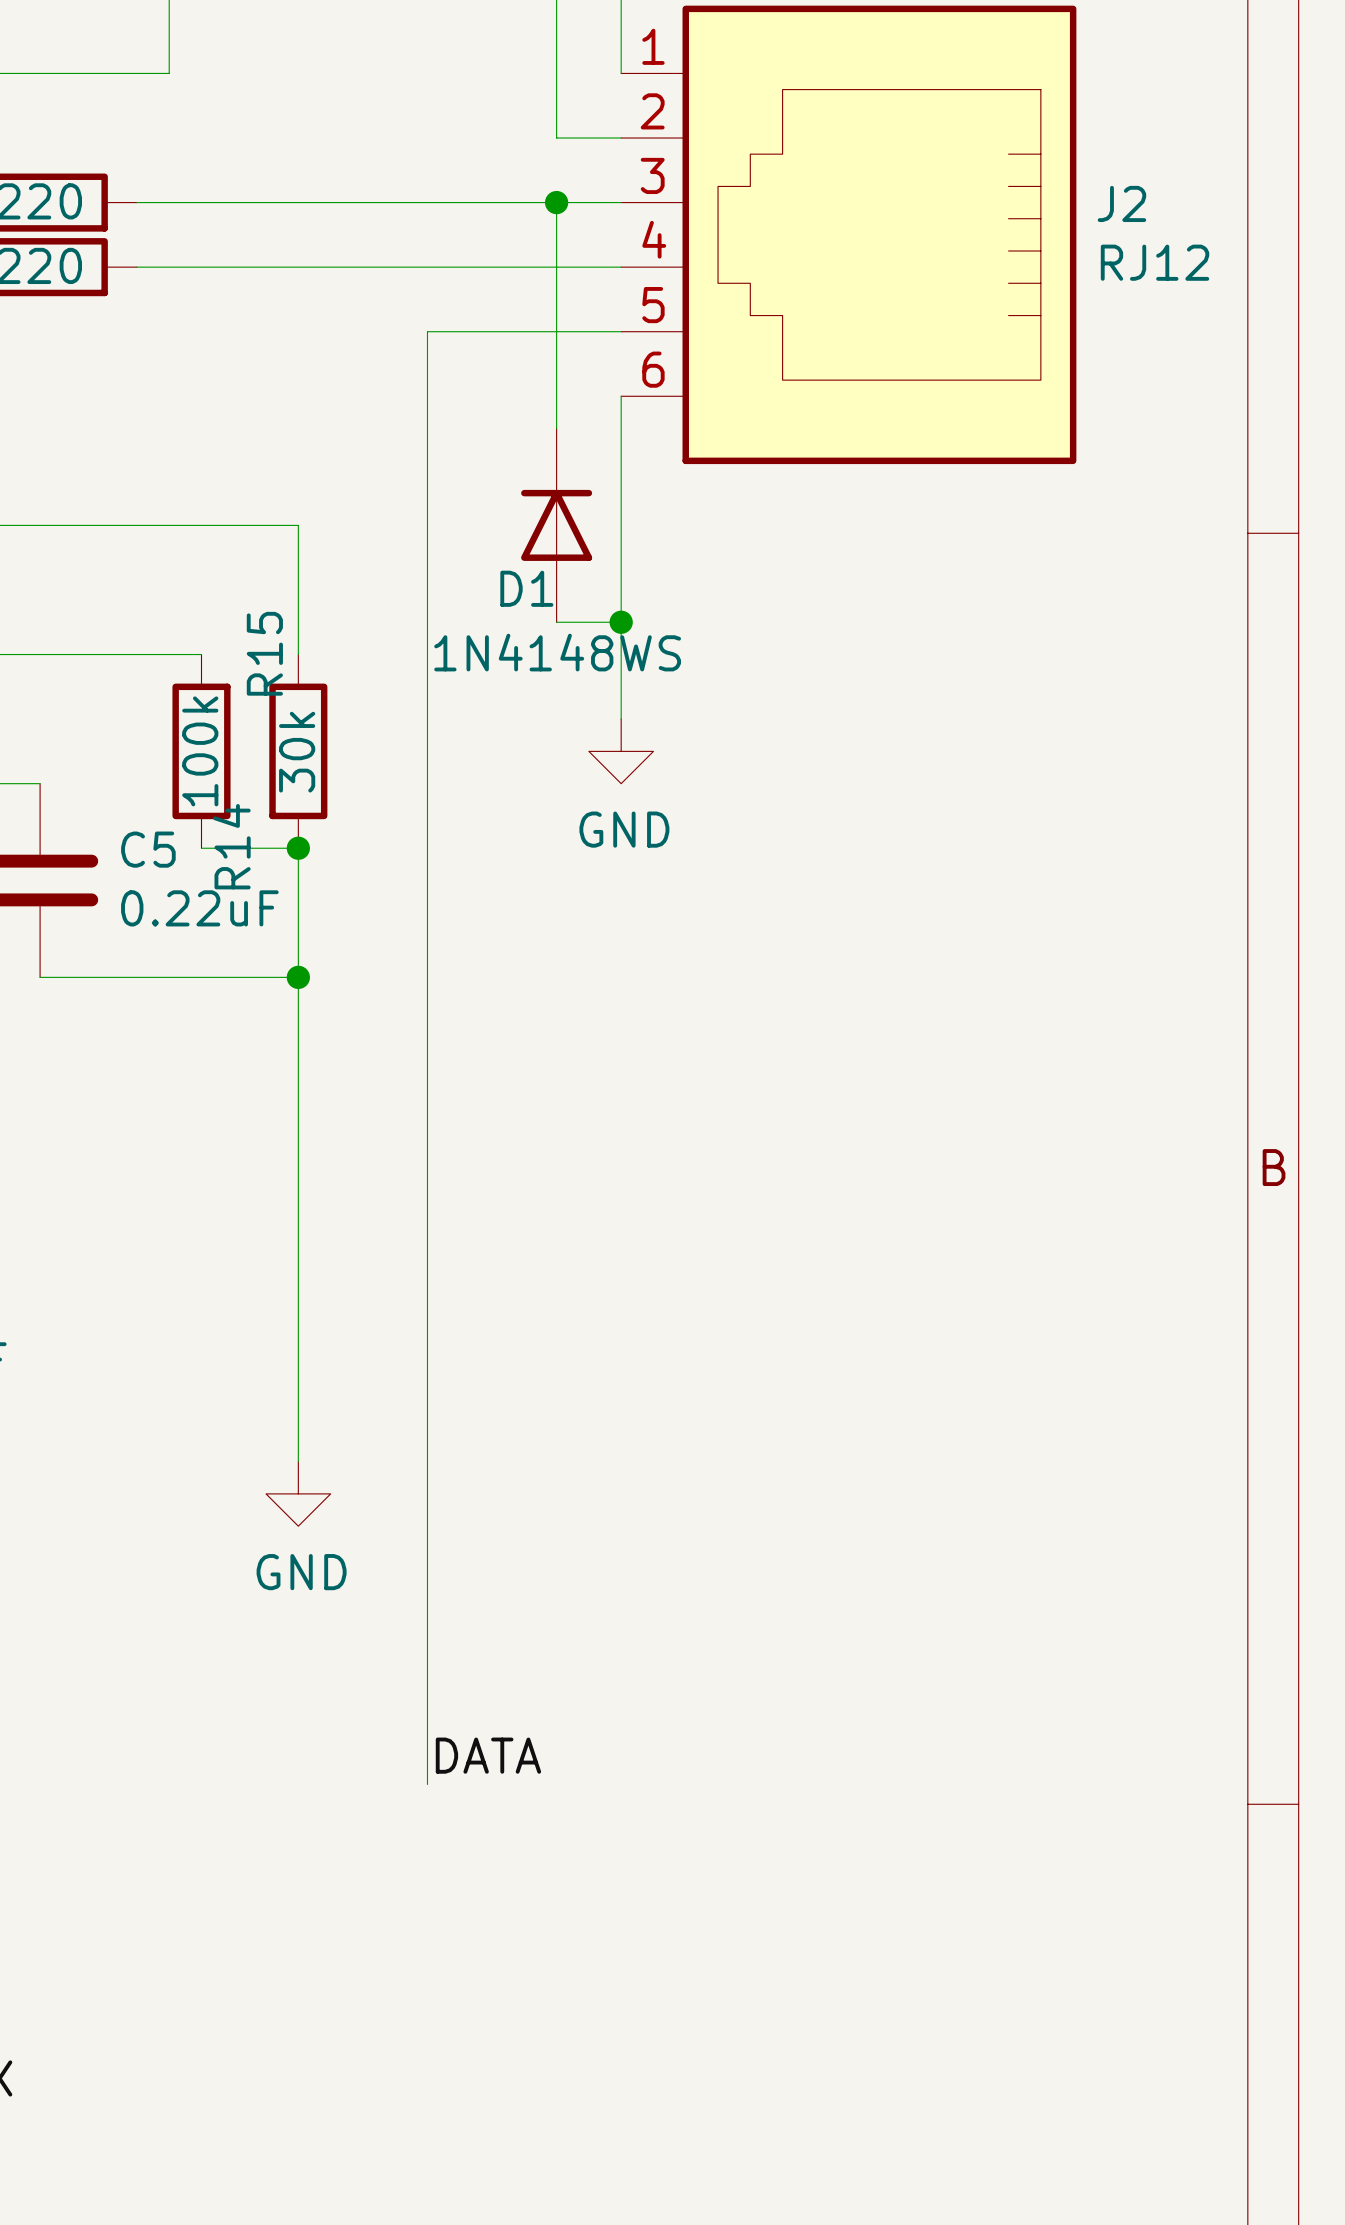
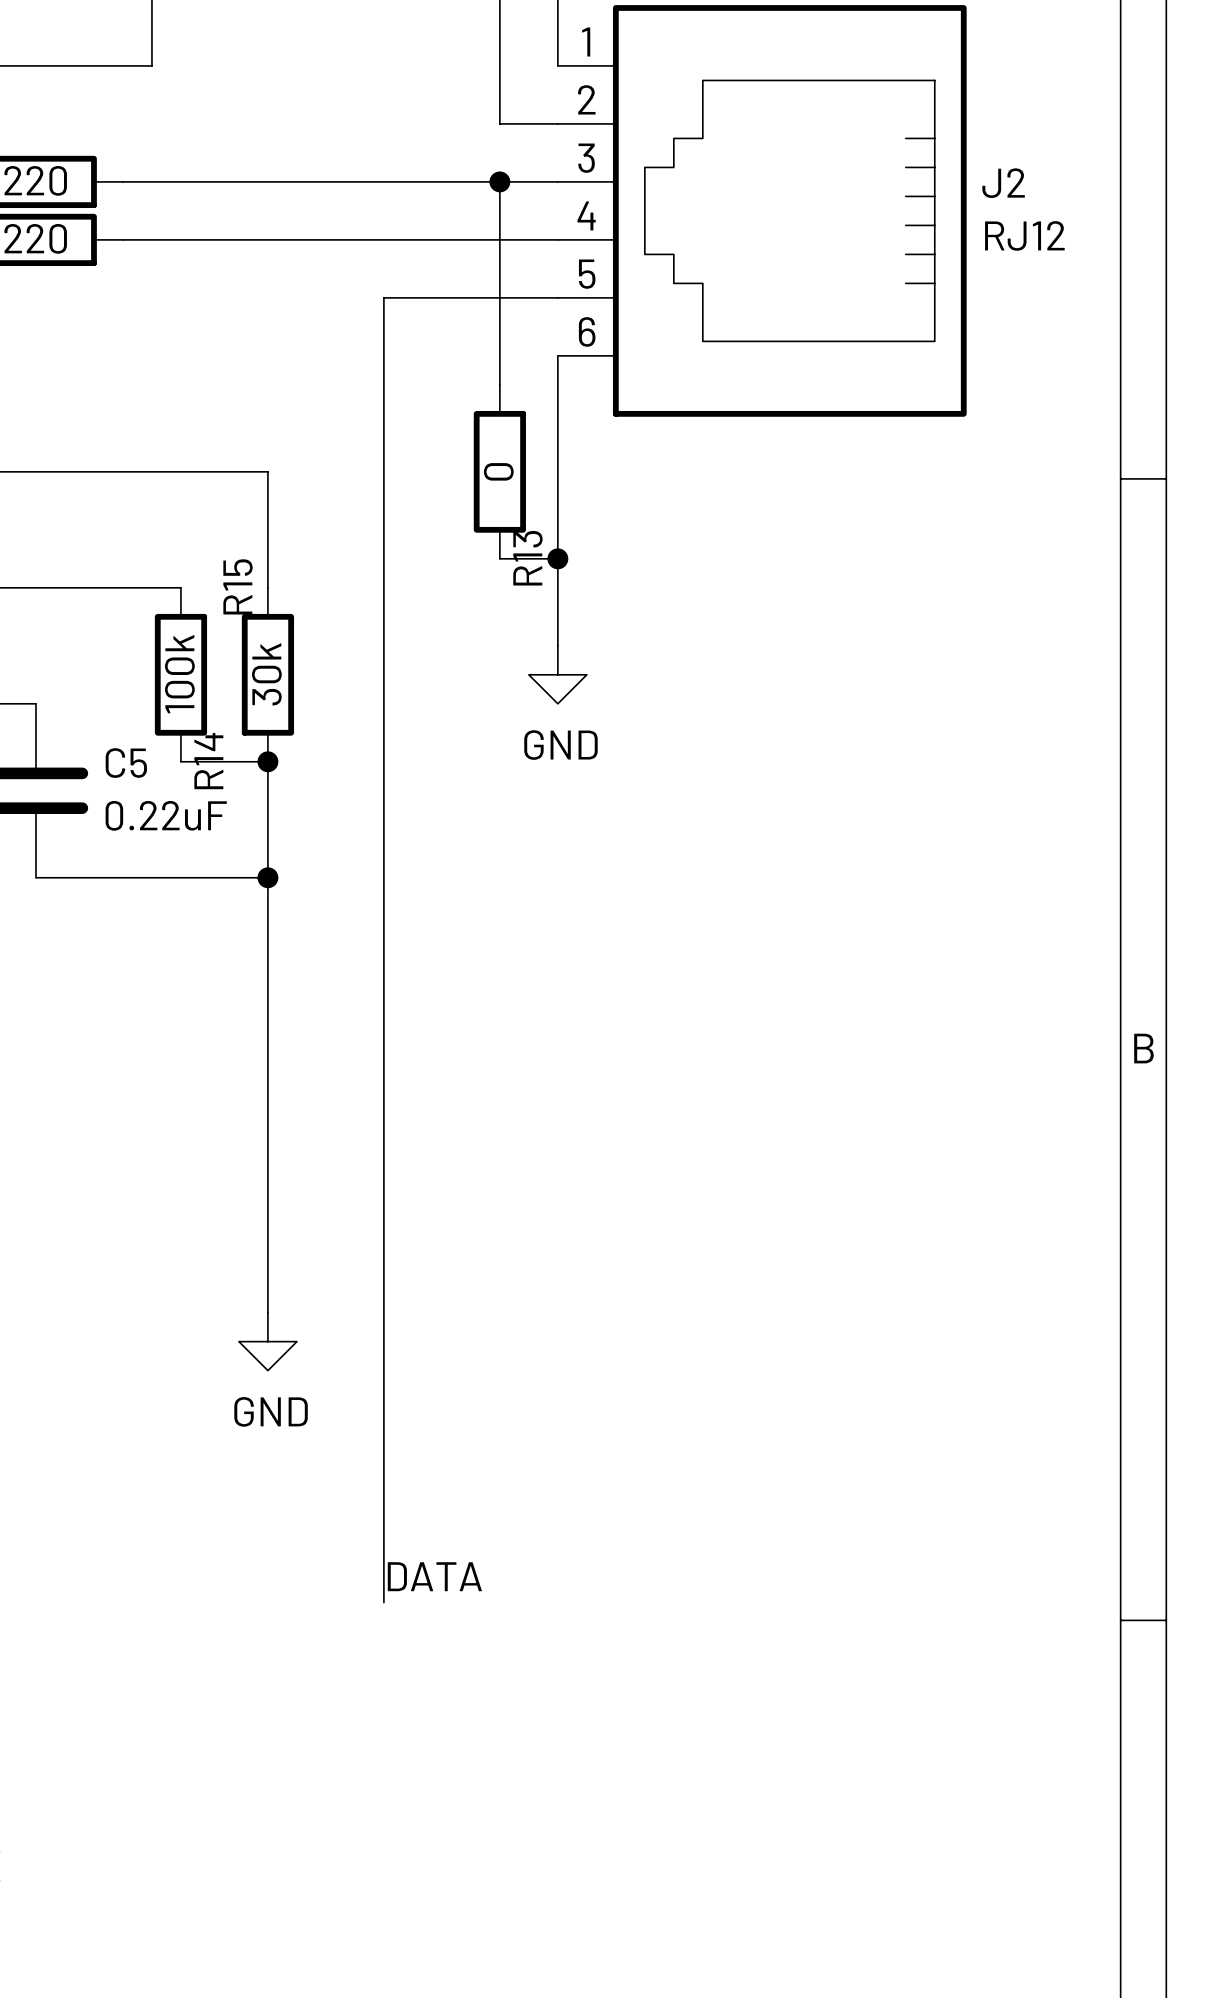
D1: 1N4148WS (556, 525) -> none
R13: none -> 0 (499, 471)

